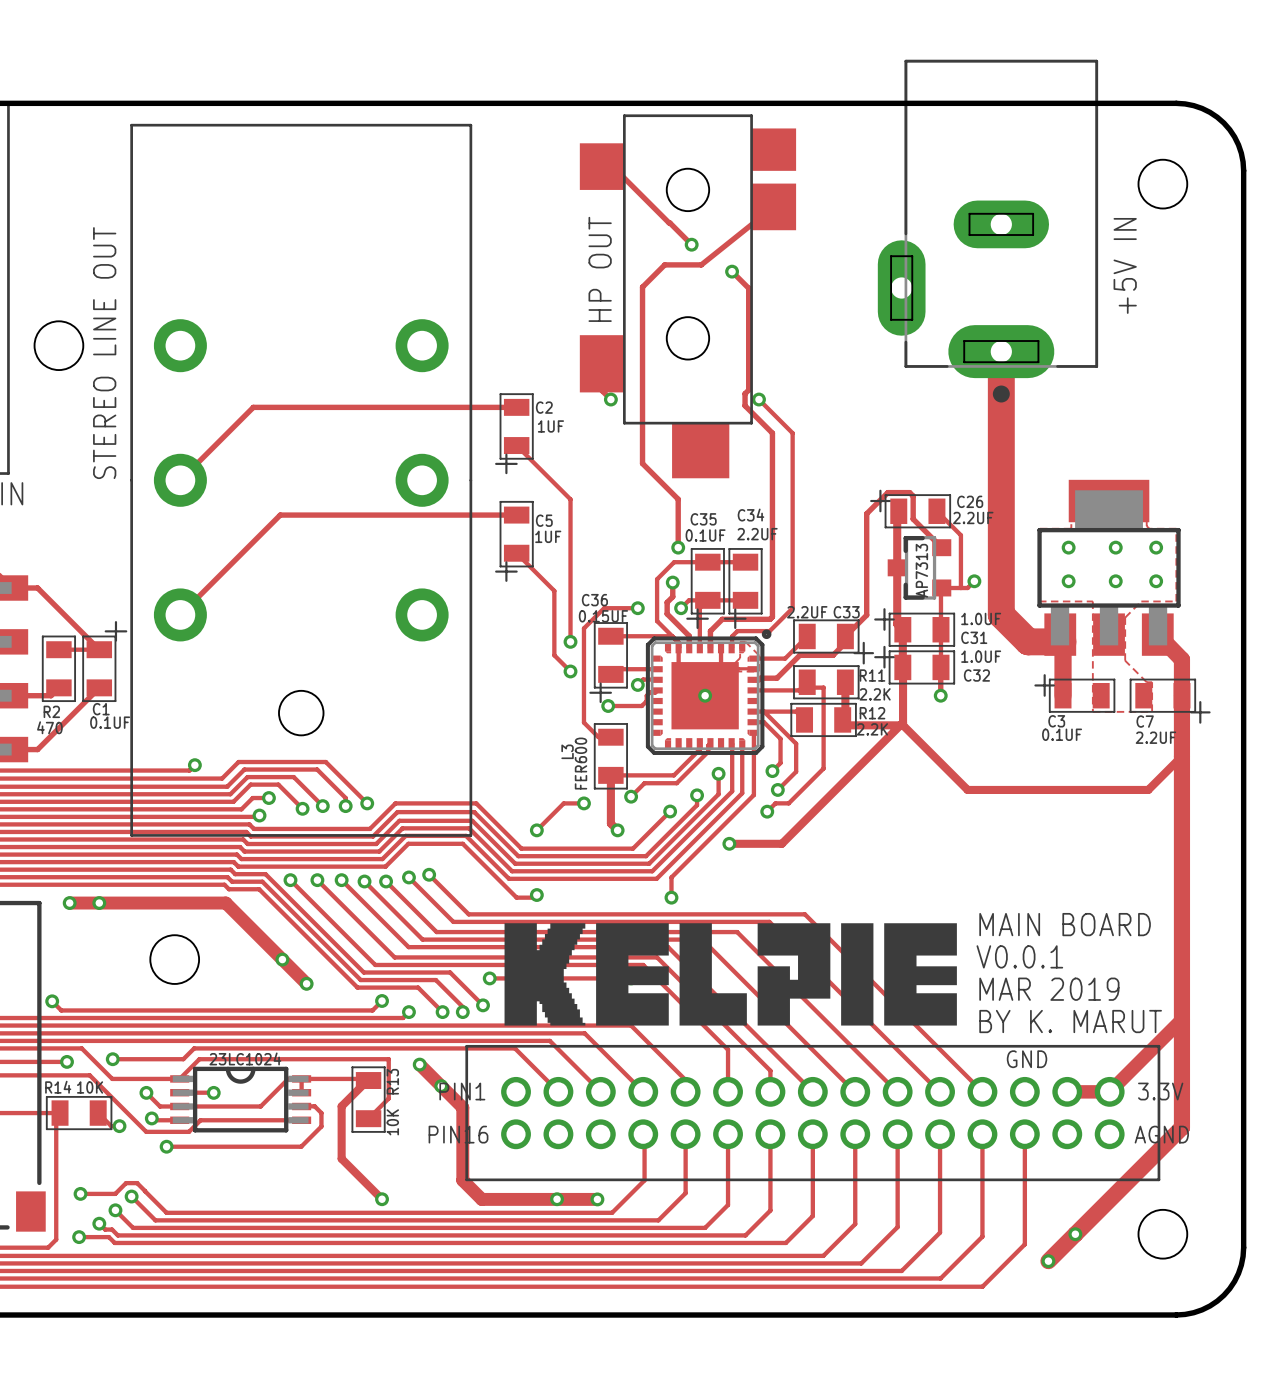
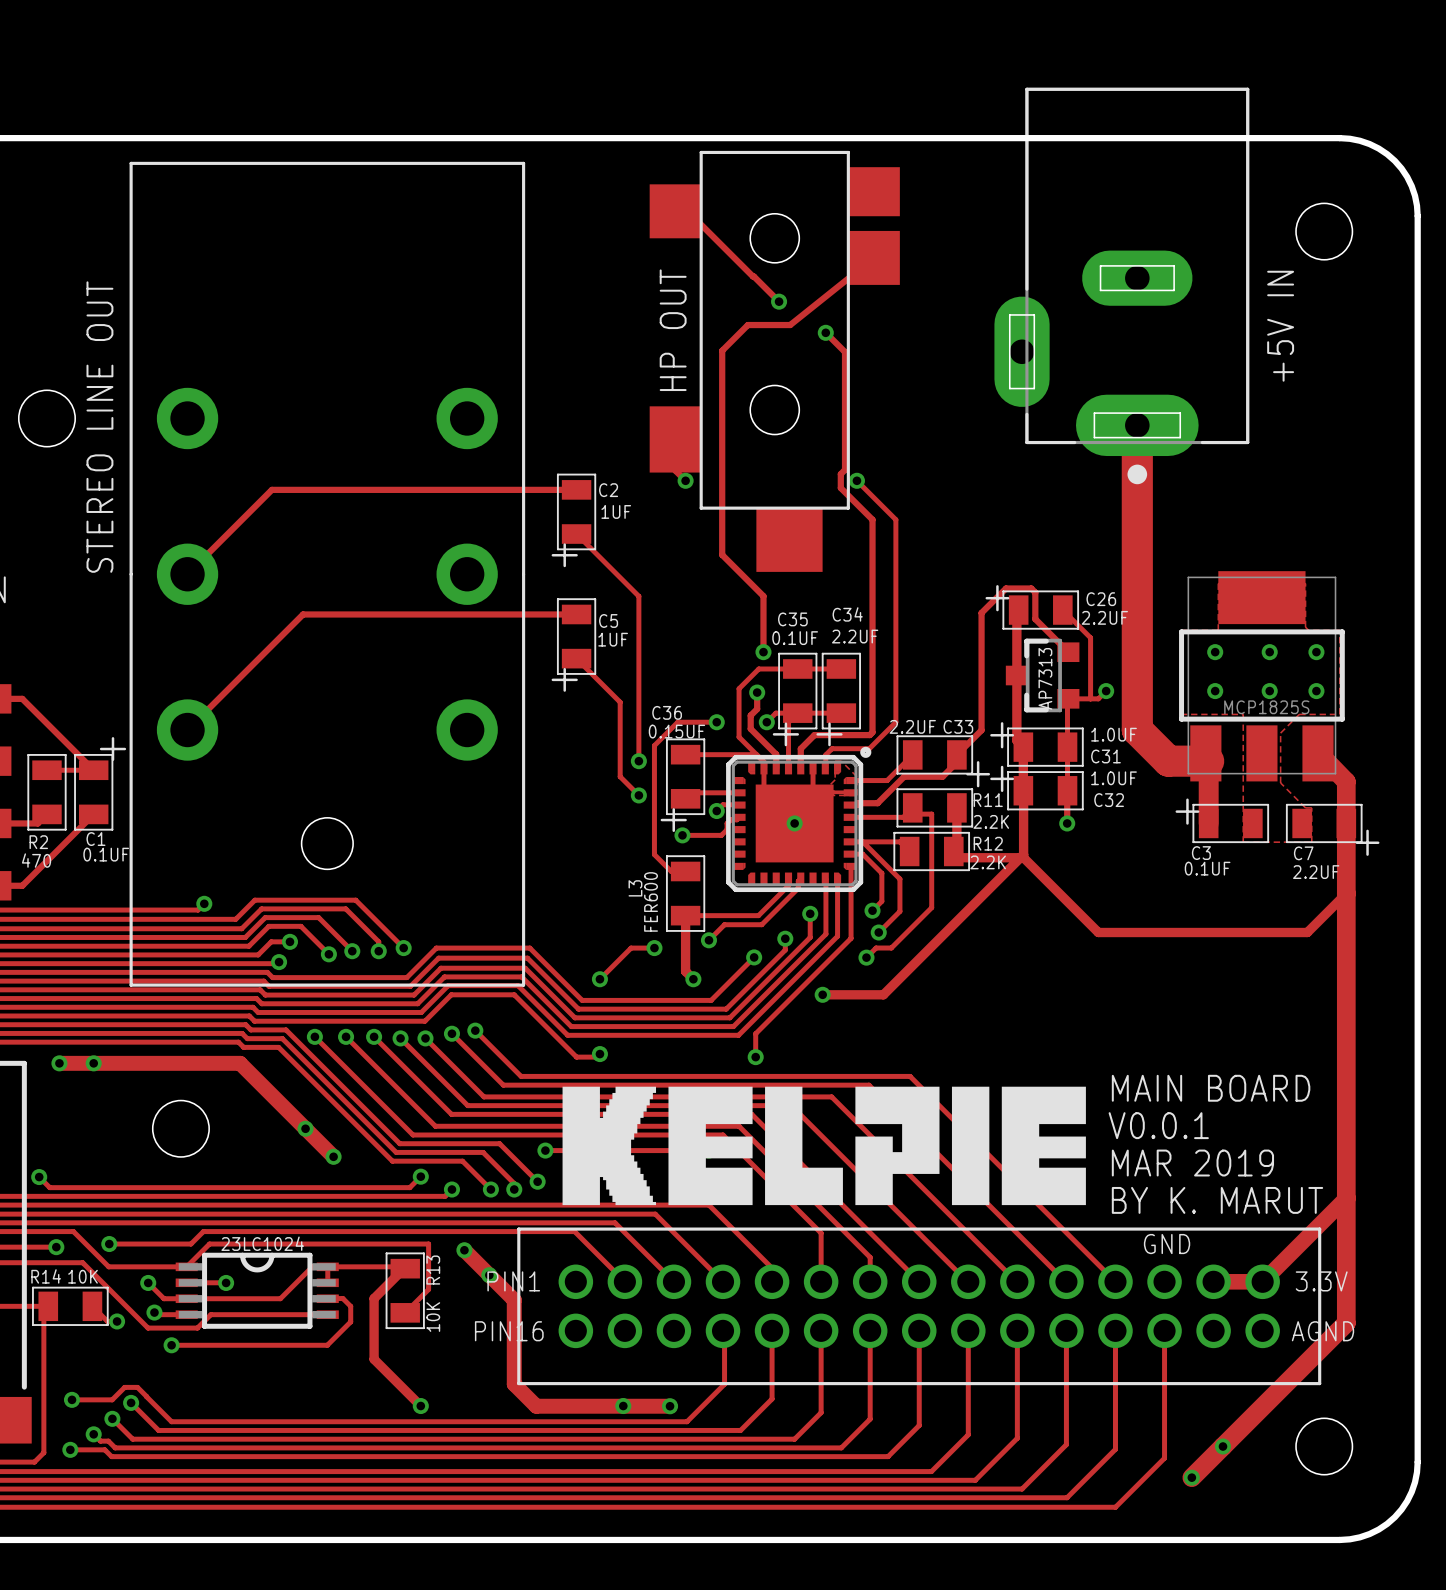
part footprint: [1037, 479, 1181, 656] -> [1179, 571, 1345, 782]
part value: none -> MCP1825S (1266, 707)

